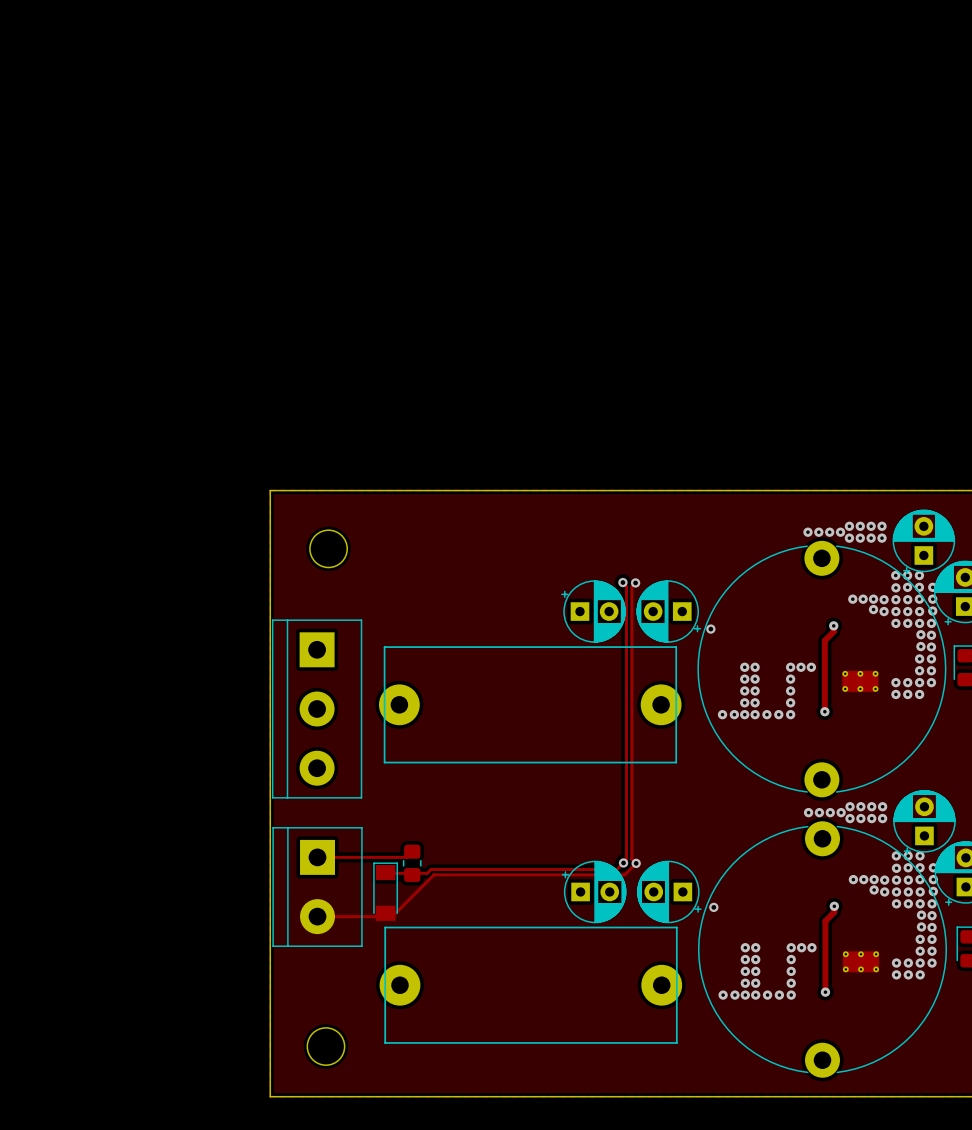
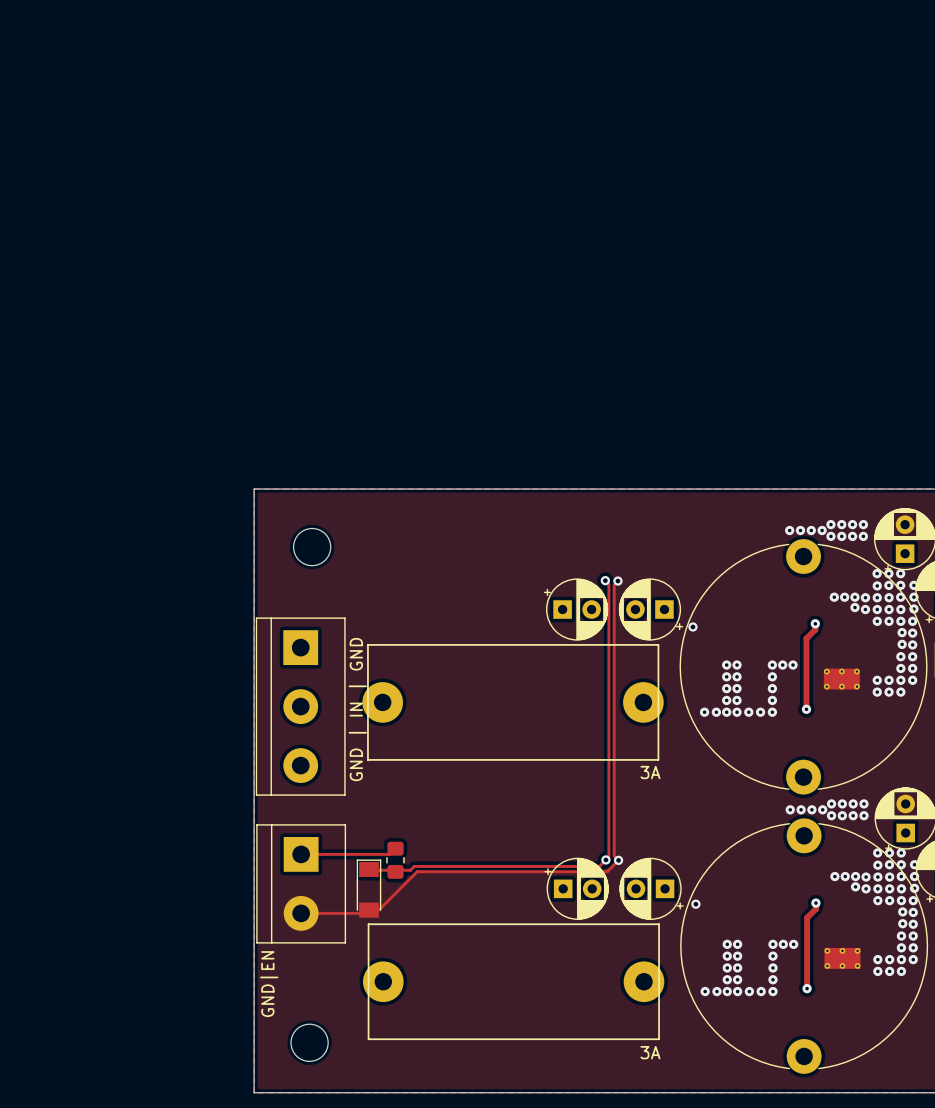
text: none -> GND | IN | GND (357, 709)
text: none -> 3A (650, 772)
text: none -> GND|EN (269, 984)
text: none -> 3A (650, 1052)

